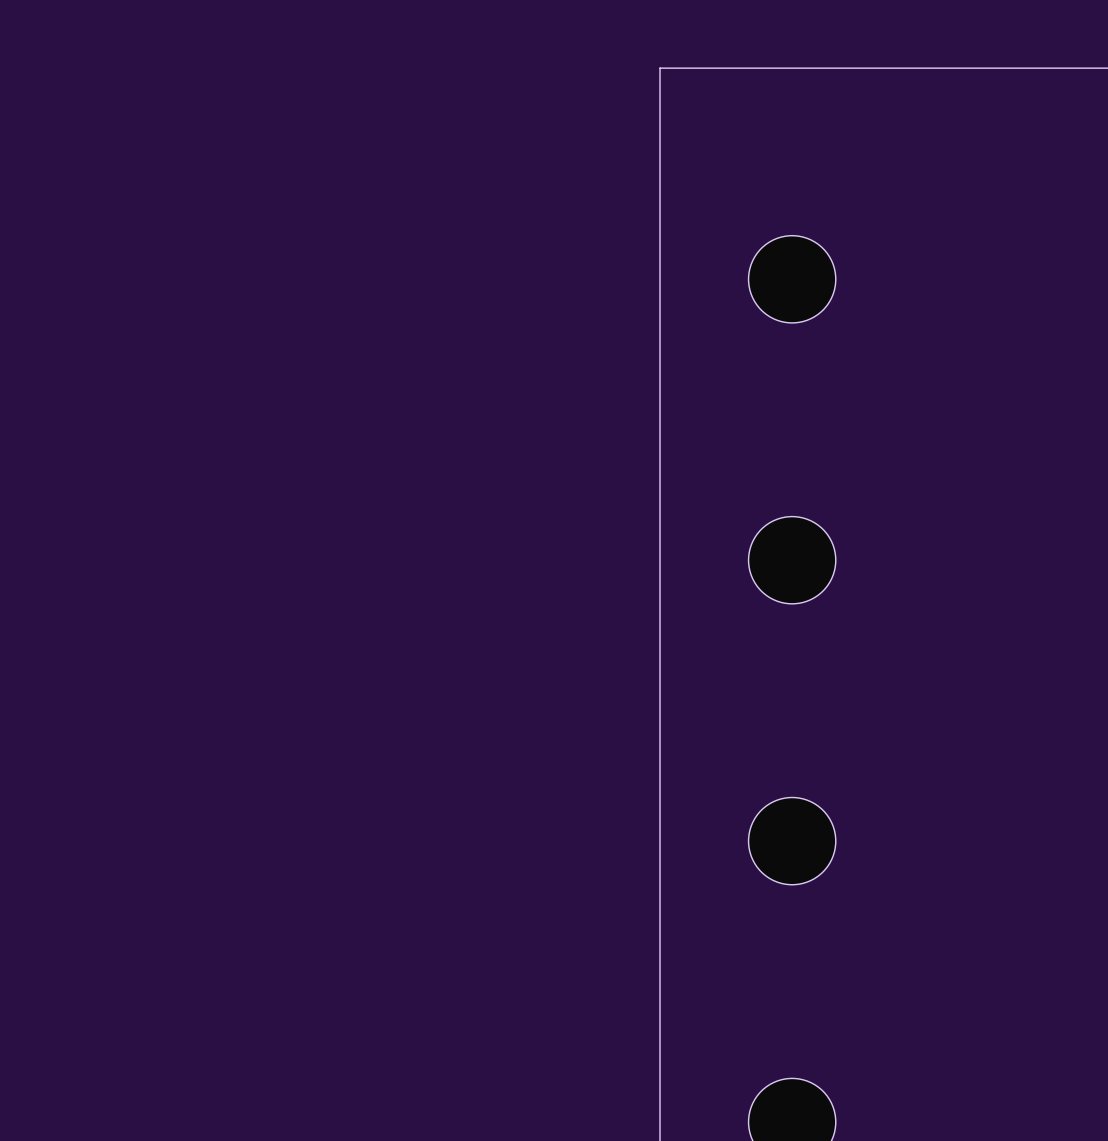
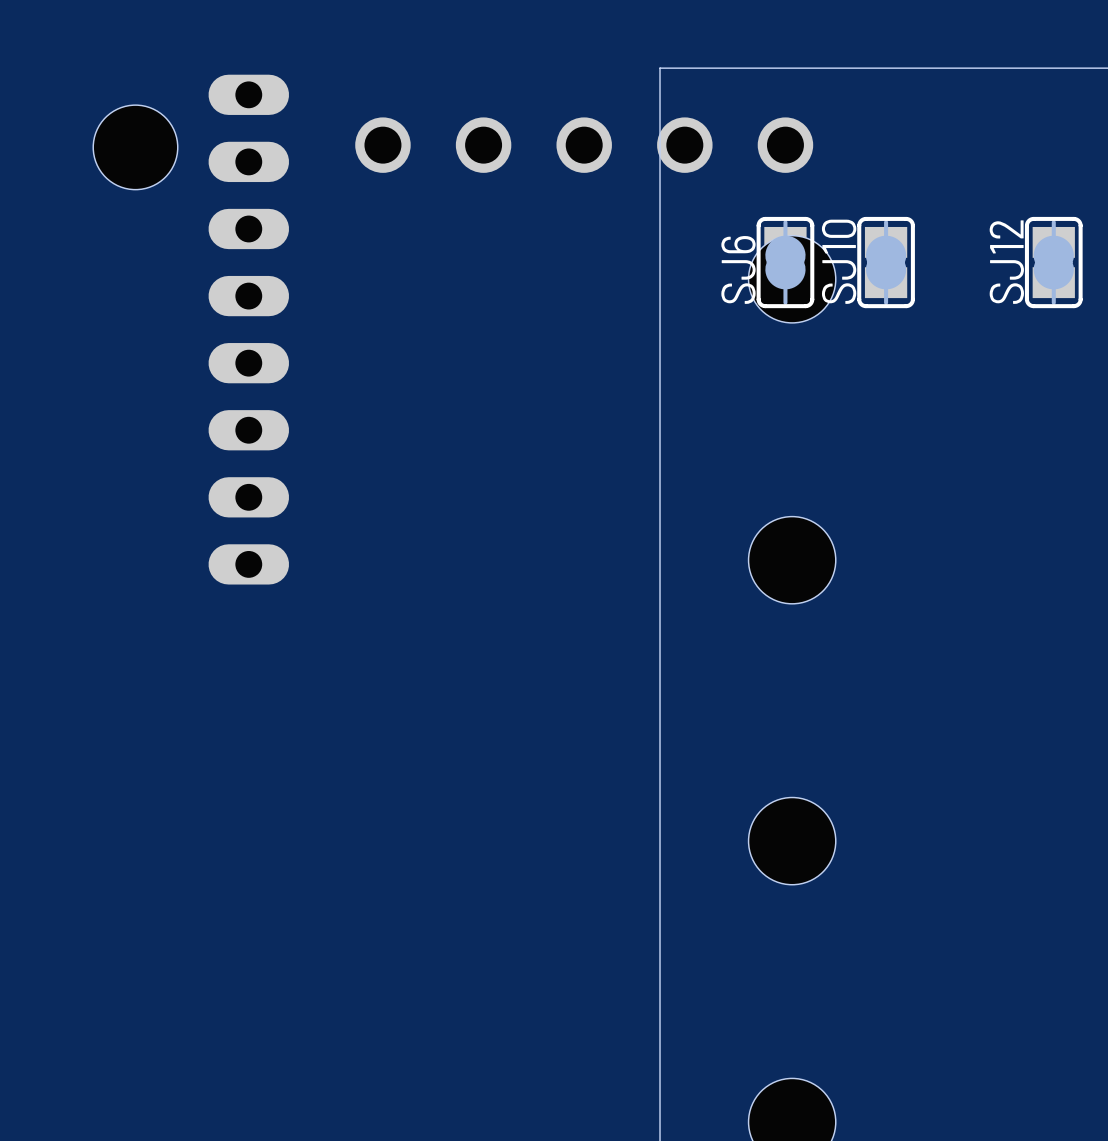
part: none -> (584, 145)
hole: none -> (135, 147)
SJ6: none -> (785, 262)
SJ10: none -> (886, 262)
SJ12: none -> (1053, 262)
part: none -> (248, 329)

